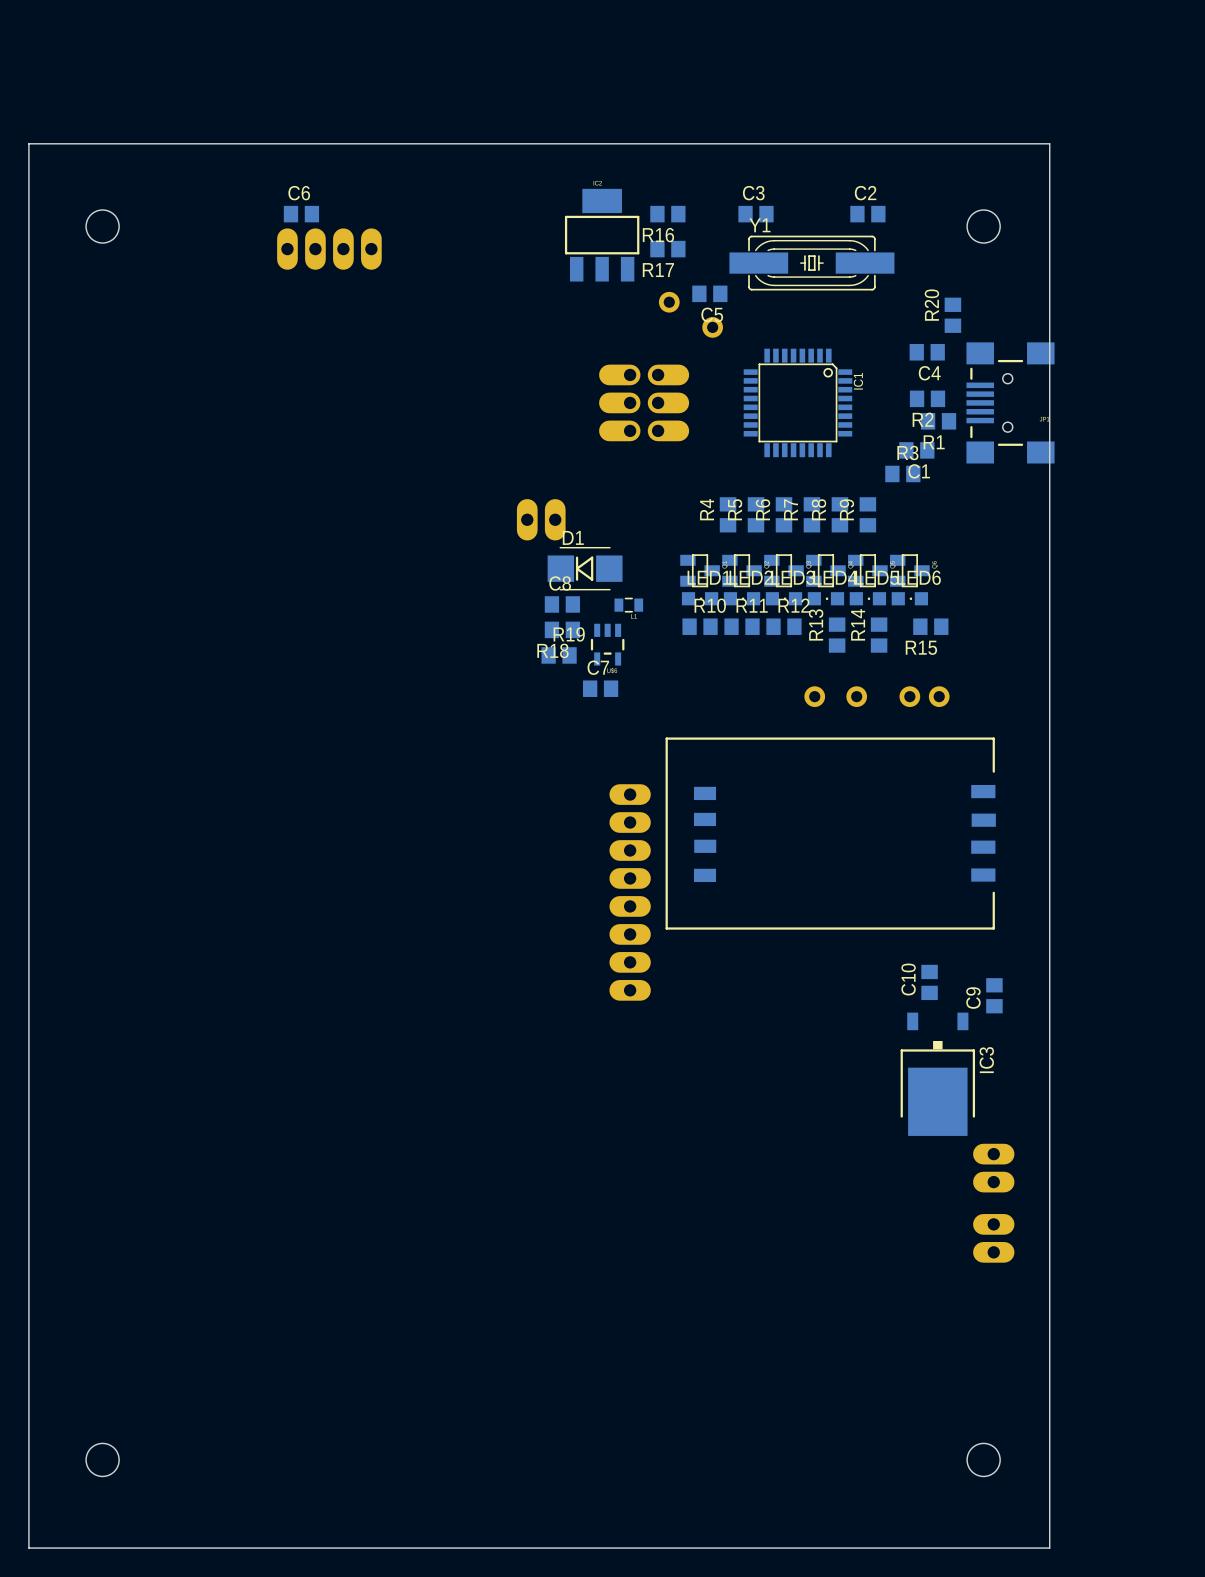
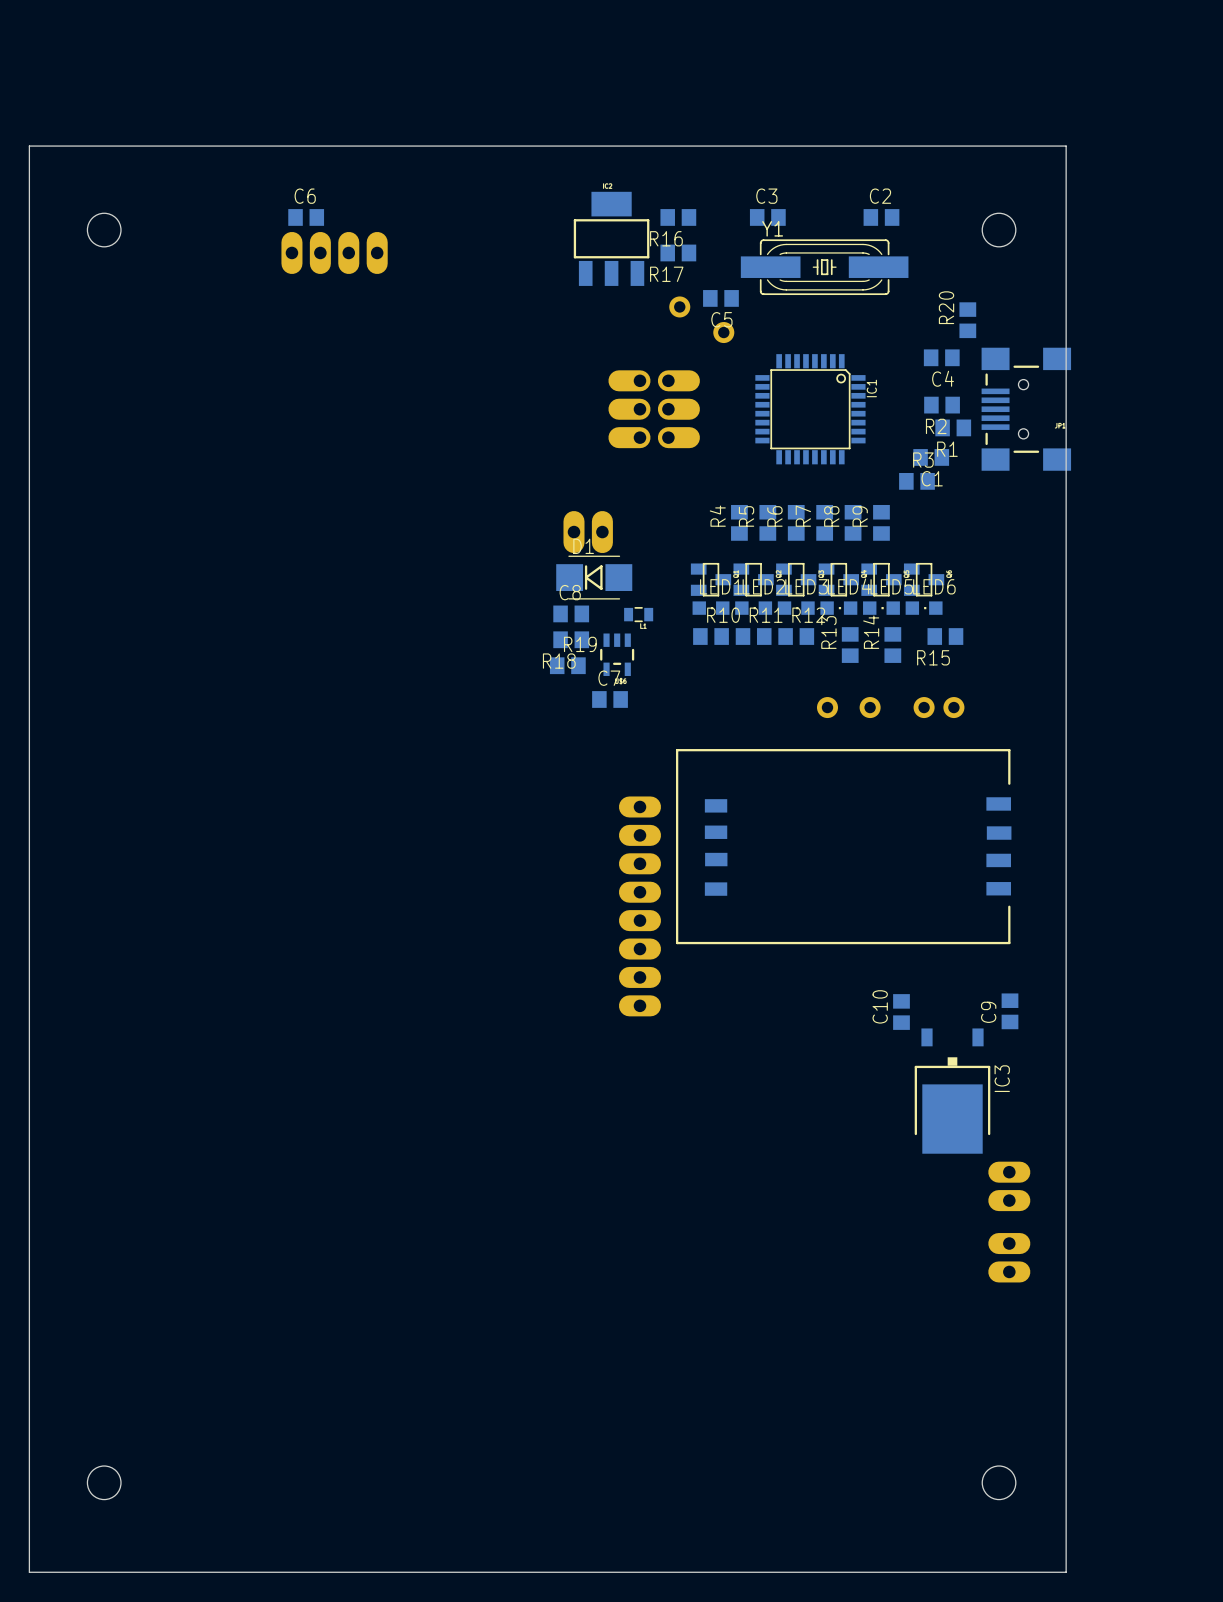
part position: (541, 519) -> (588, 532)
C10 position: (929, 982) -> (901, 1012)

